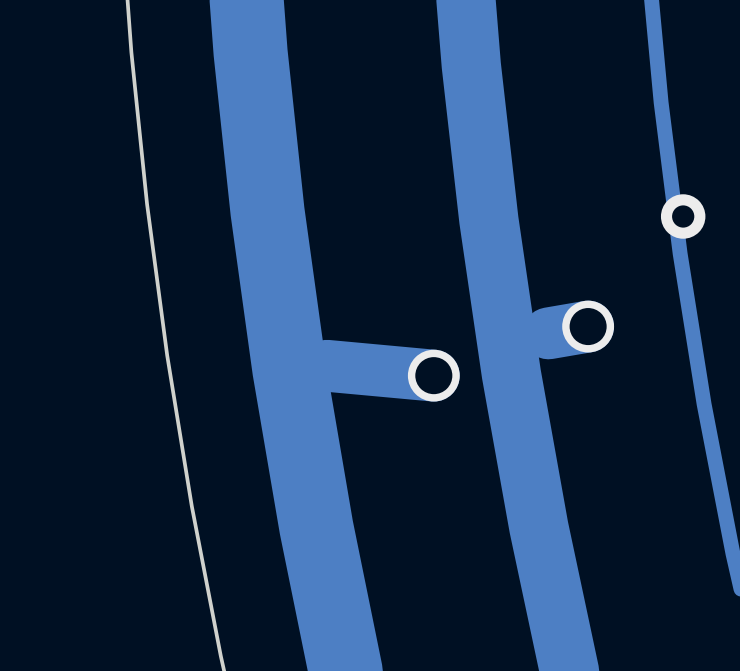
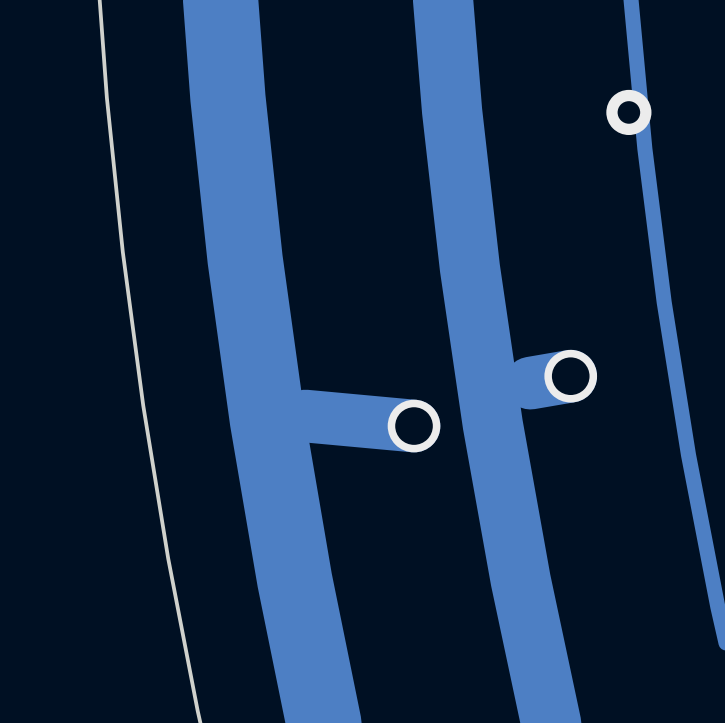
via position: (683, 216) -> (628, 112)

